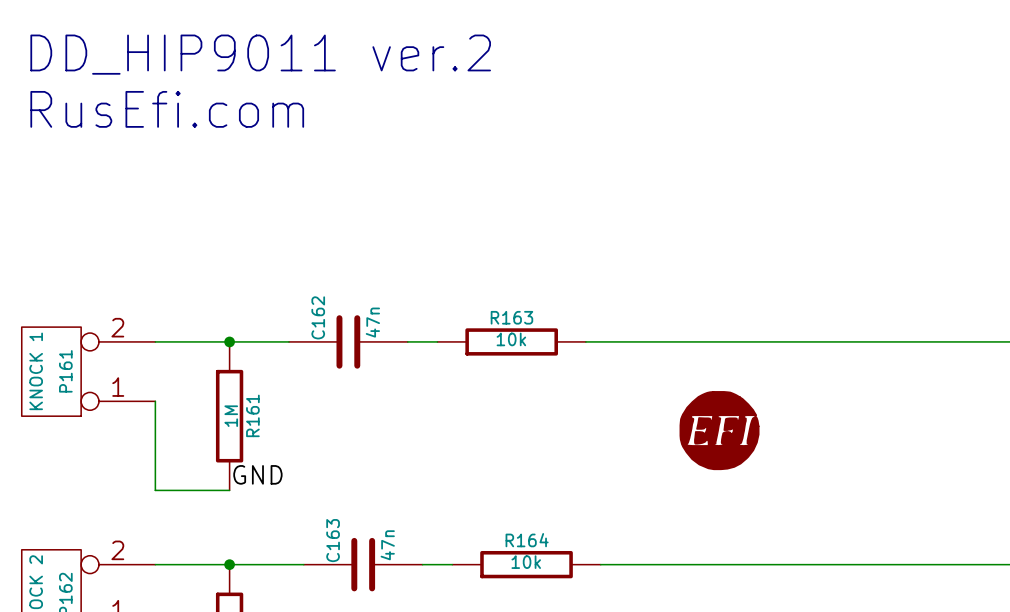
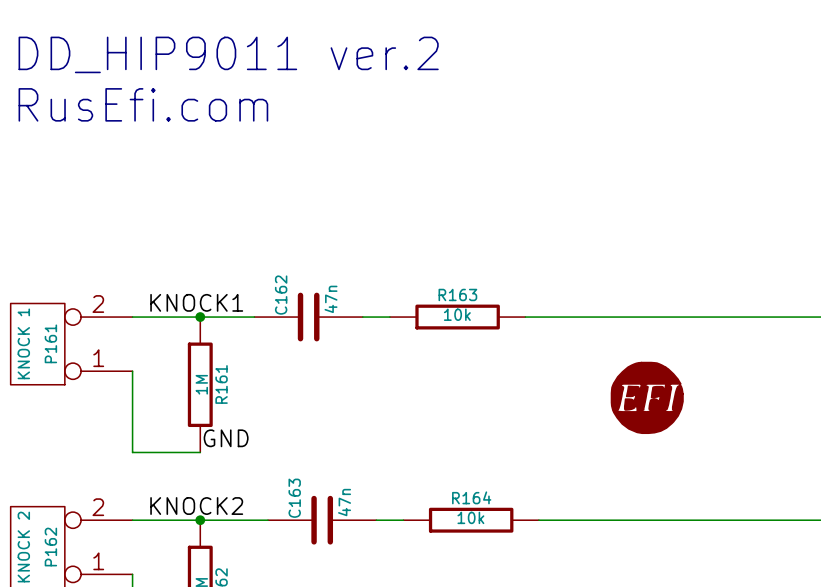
label: none -> KNOCK1 (196, 302)
label: none -> KNOCK2 (196, 506)

